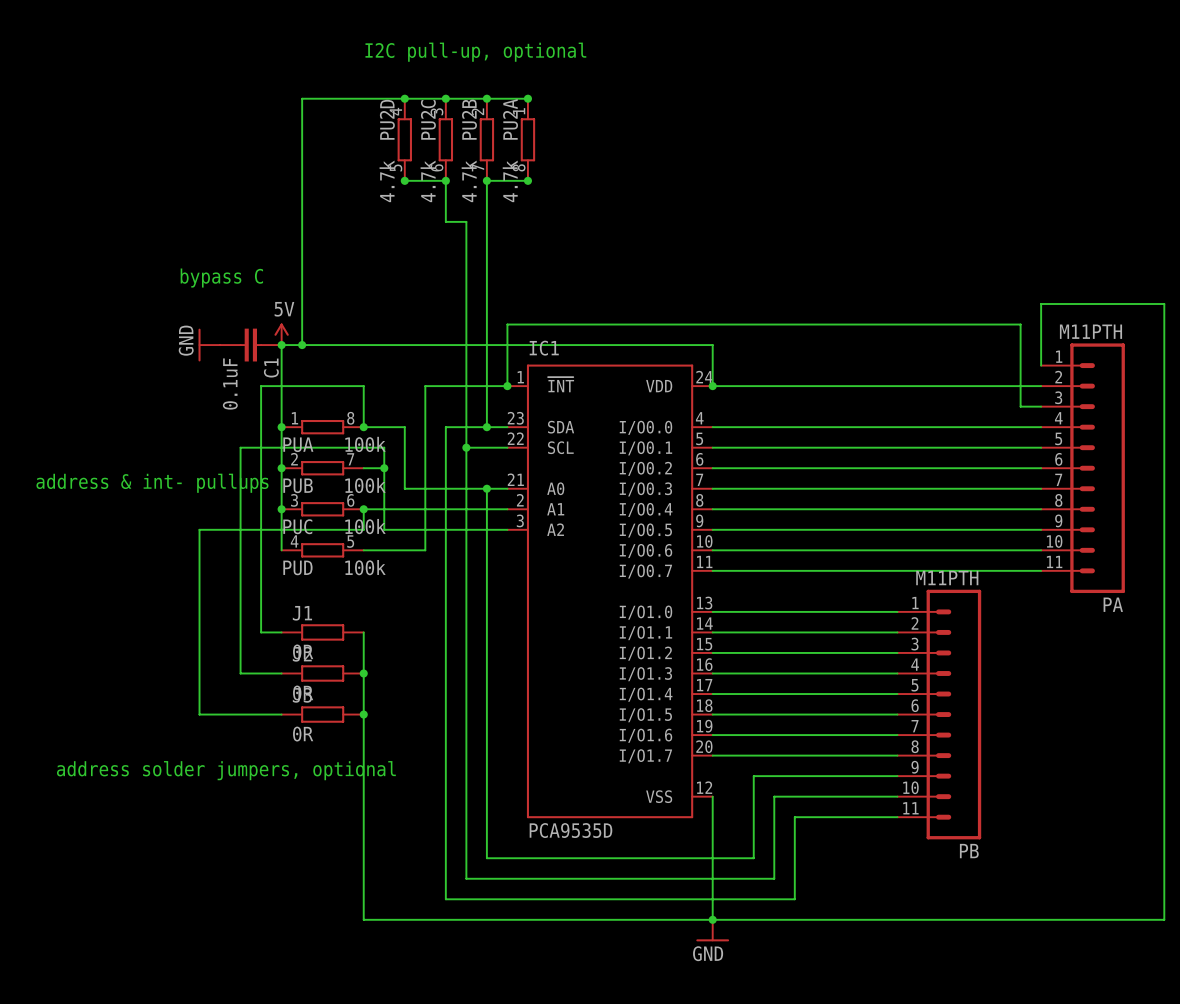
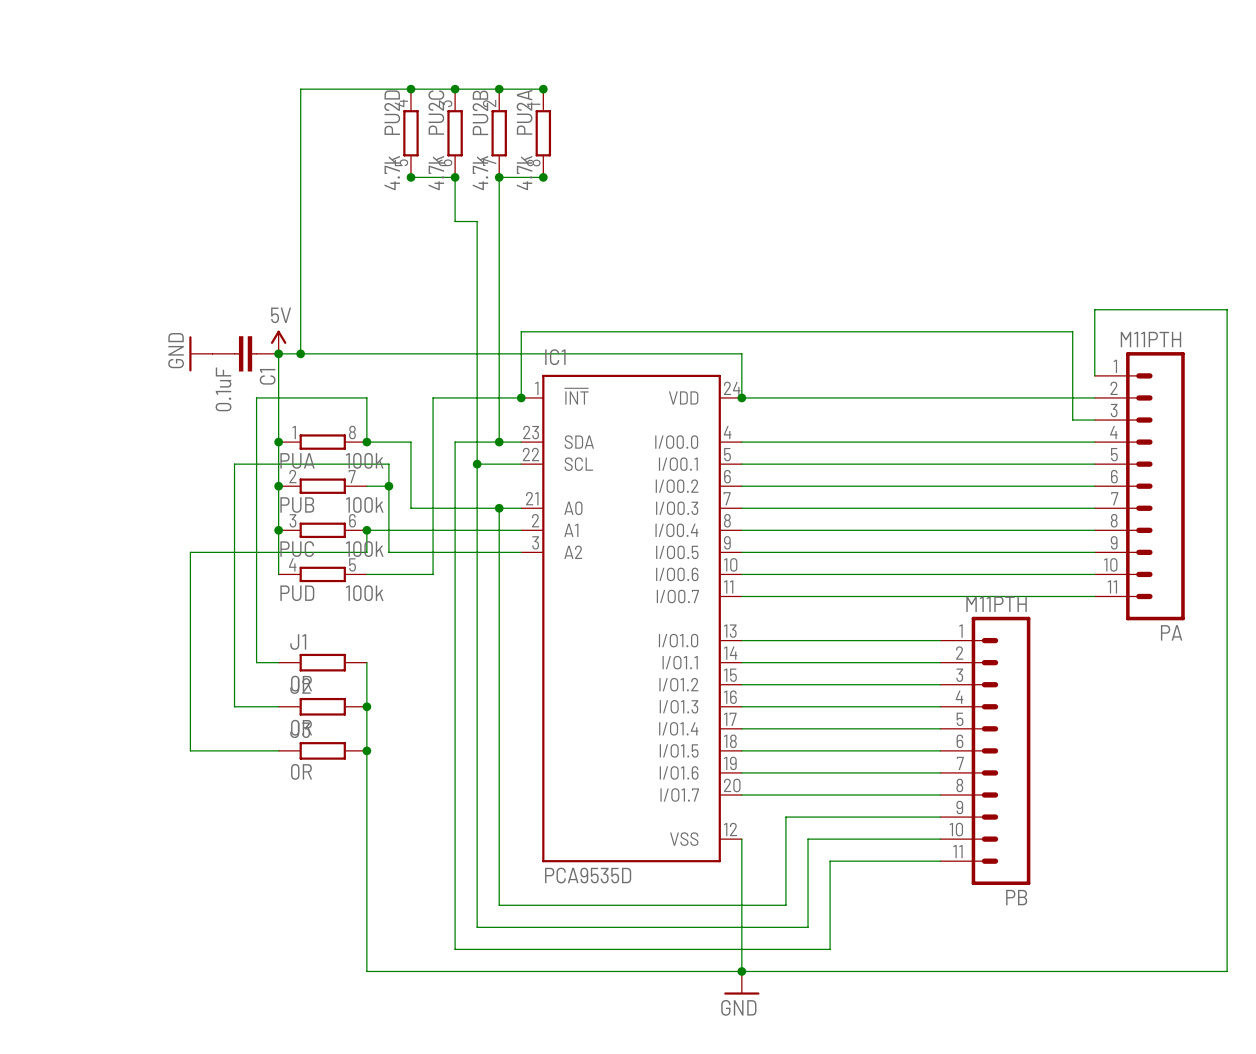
text: I2C pull-up, optional (475, 52) -> none
text: bypass C (221, 278) -> none
text: address & int- pullups (152, 483) -> none
text: address solder jumpers, optional (226, 770) -> none

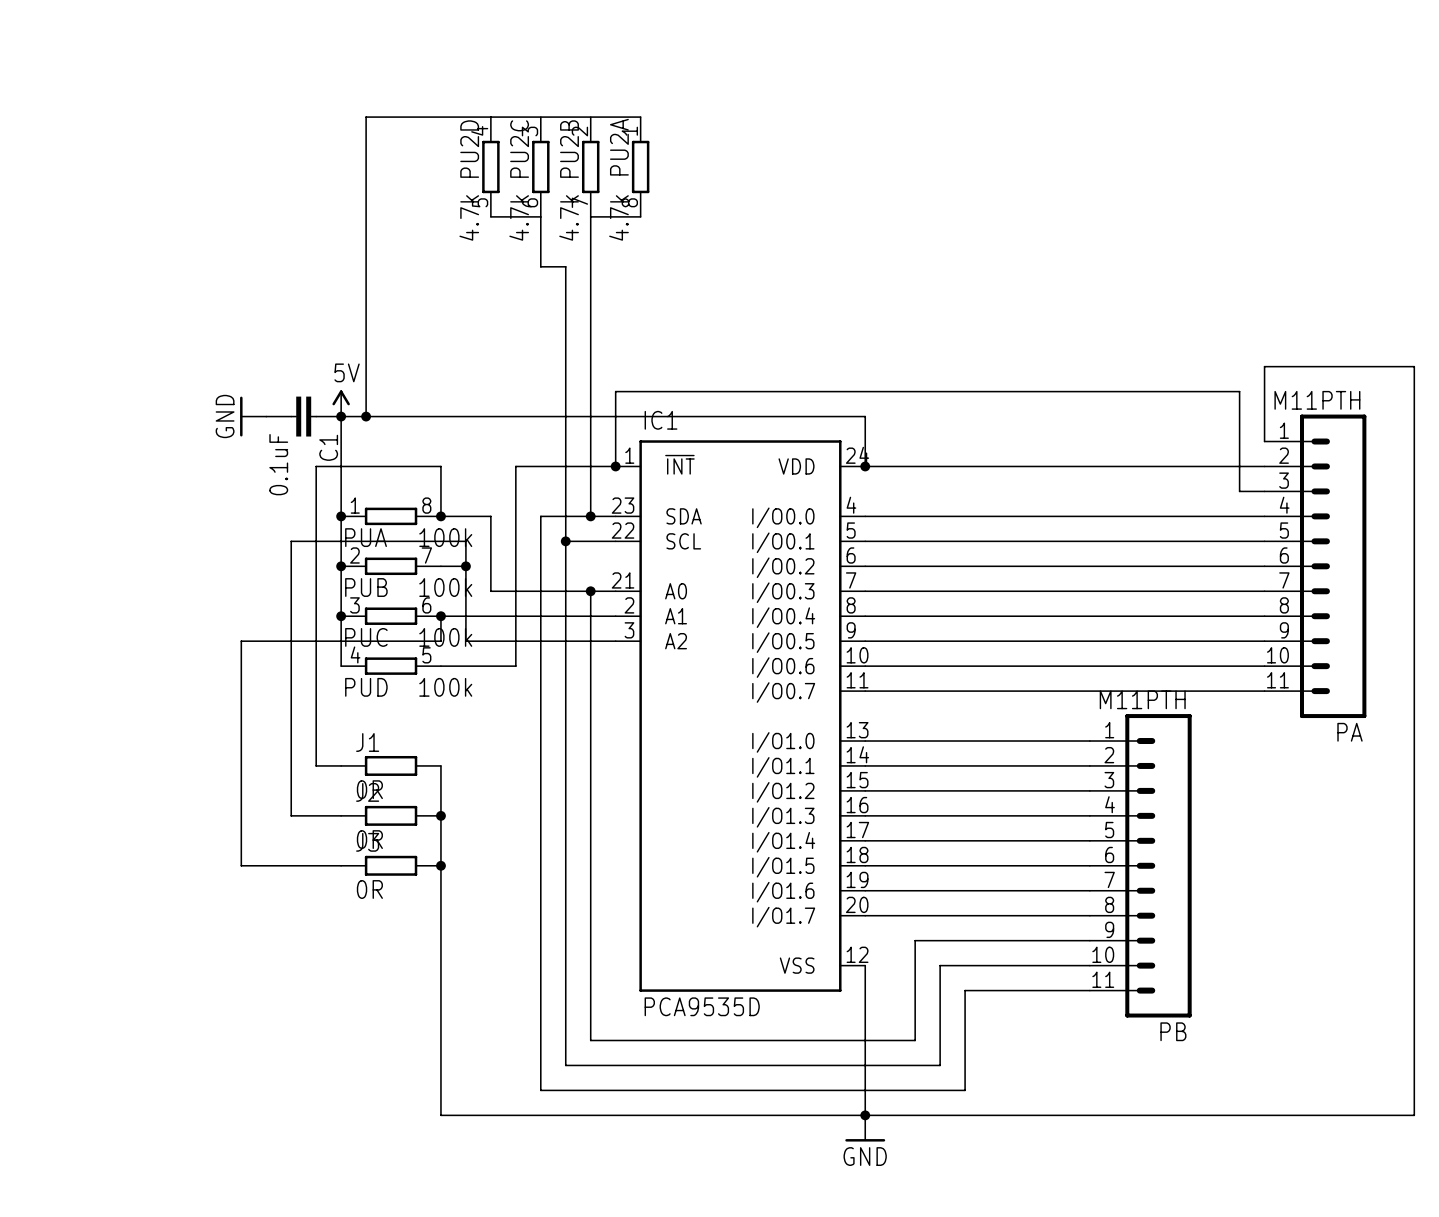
junction: (410, 89) -> none
junction: (455, 89) -> none
junction: (499, 89) -> none
junction: (543, 89) -> none
junction: (410, 177) -> none
junction: (455, 177) -> none
junction: (499, 177) -> none
junction: (543, 177) -> none

